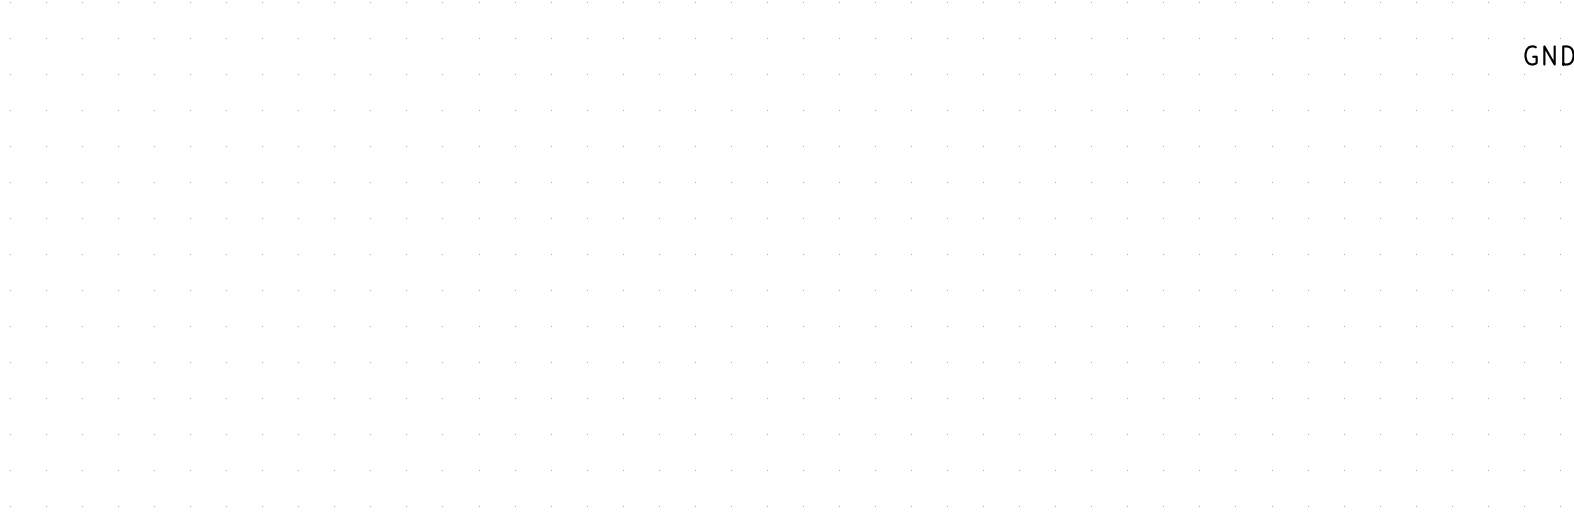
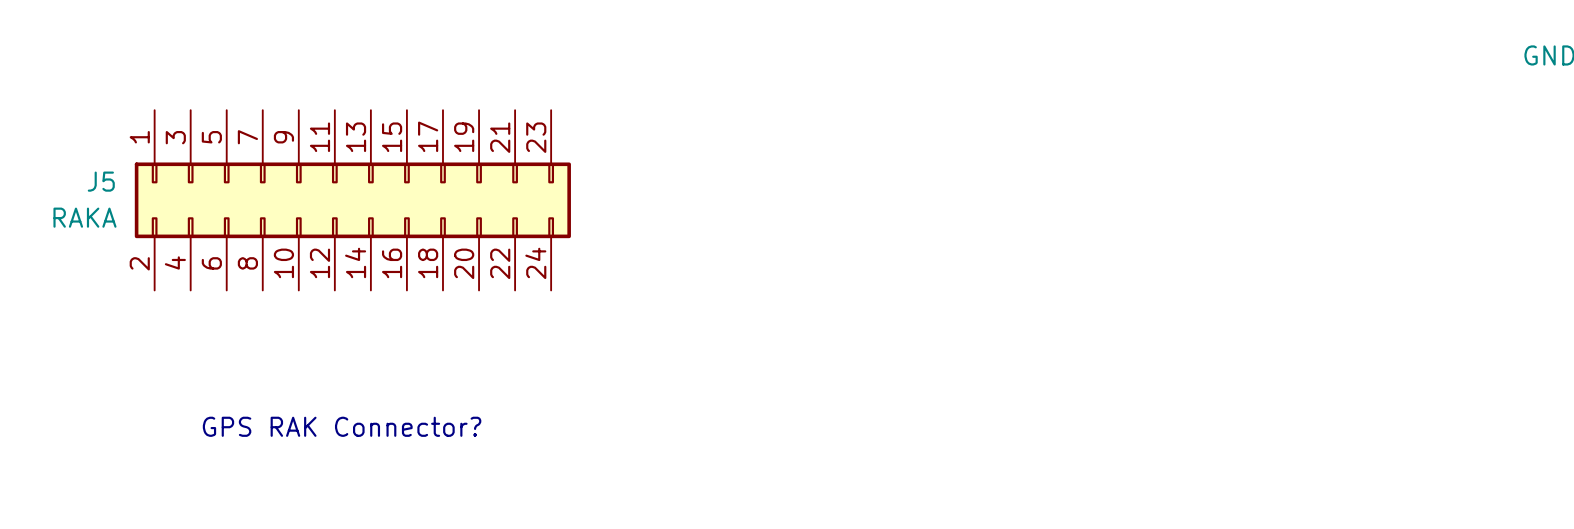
J5: none -> RAKA (352, 200)
text: none -> GPS RAK Connector? (342, 426)

